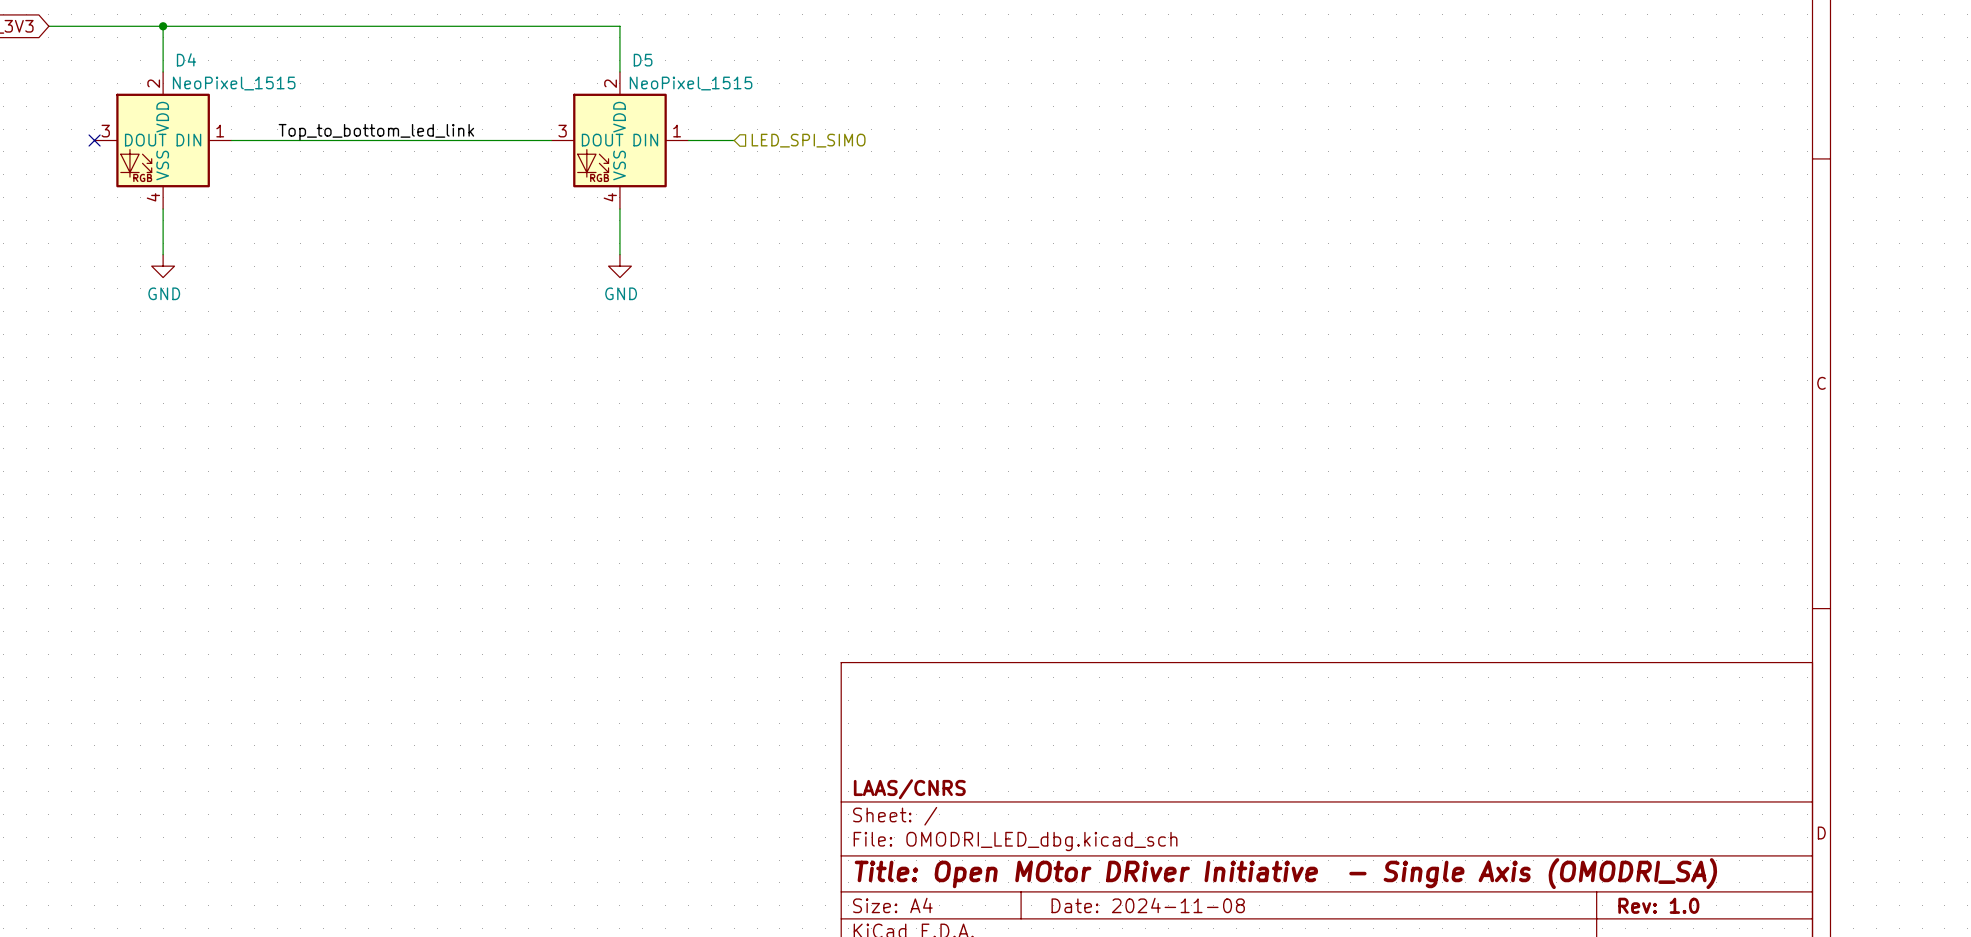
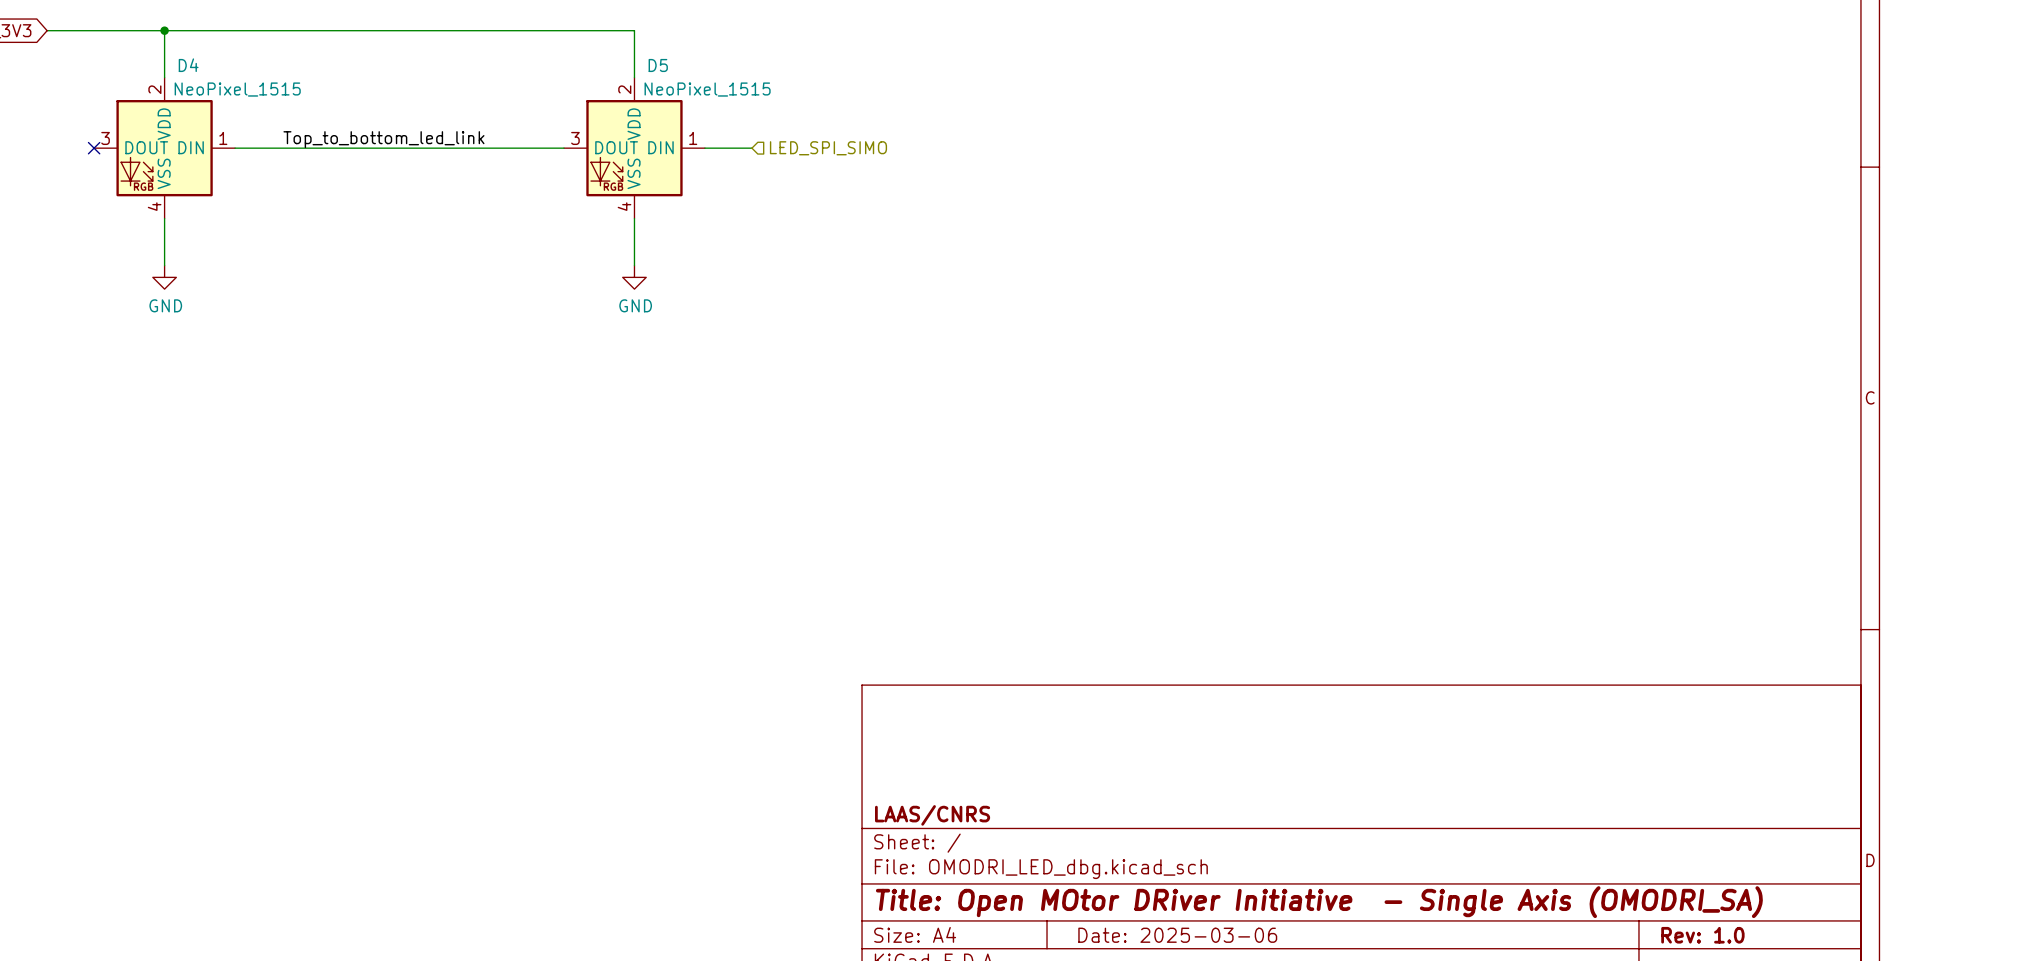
title block: Date: 2024-11-08 (1148, 905) -> Date: 2025-03-06 (1177, 935)

